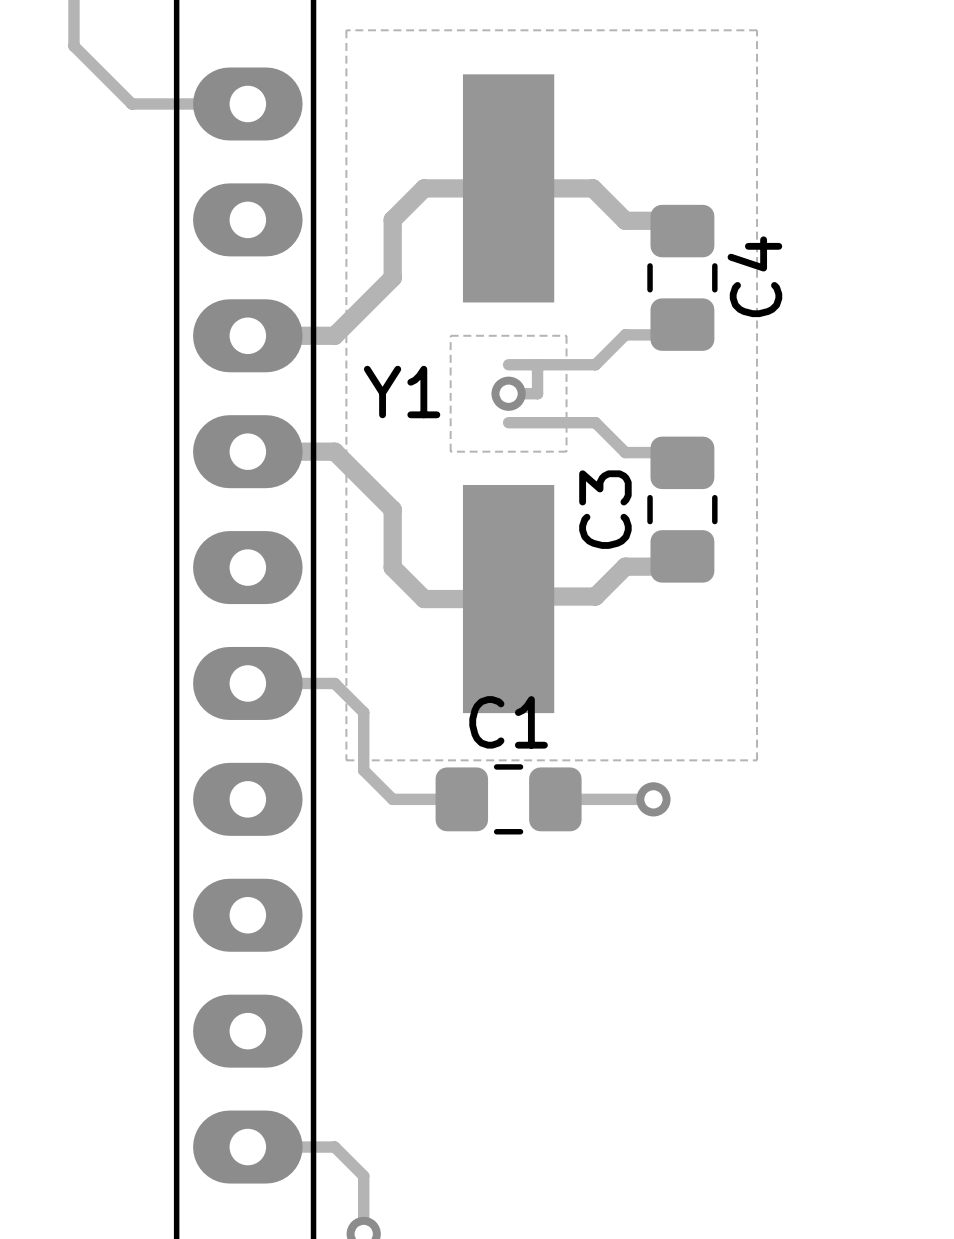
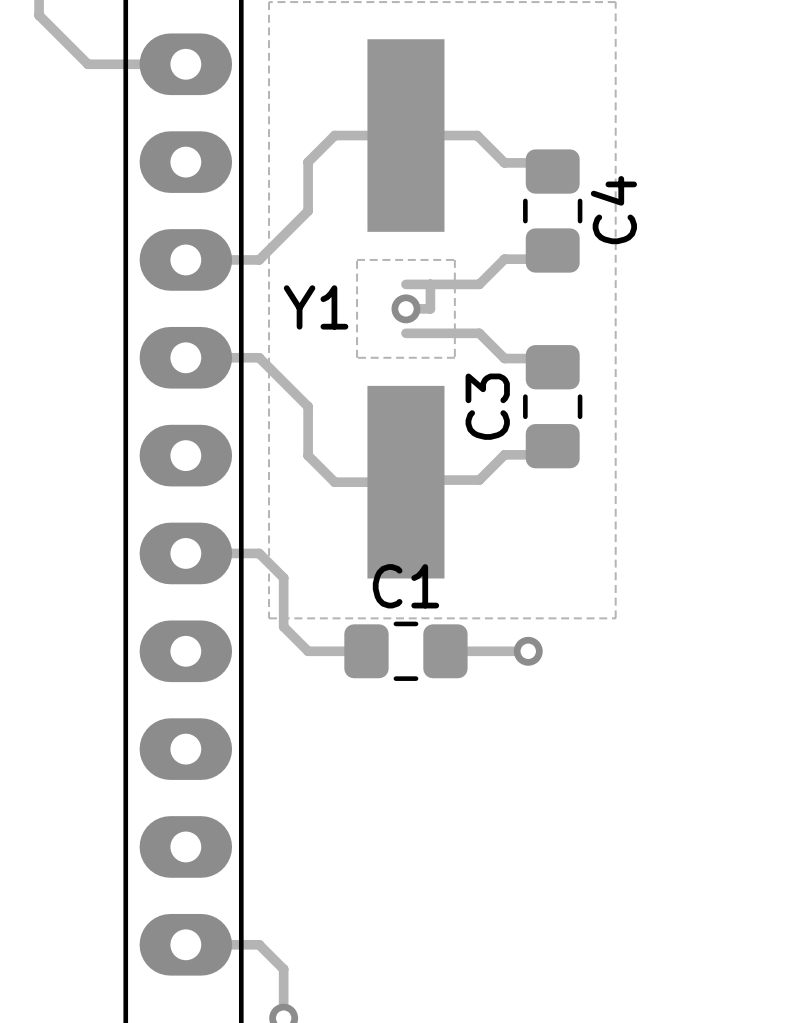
track width: thick (682, 220) (625, 220) (593, 188) (424, 188) (392, 219) (392, 277) (334, 335) (247, 335) -> thin (552, 162) (504, 162) (477, 135) (334, 135) (308, 162) (308, 211) (259, 259) (185, 259)
track width: thick (247, 451) (334, 451) (392, 509) (392, 567) (424, 599) (595, 596) (625, 566) (682, 566) -> thin (185, 357) (259, 357) (308, 406) (308, 455) (334, 482) (479, 480) (504, 454) (552, 454)

